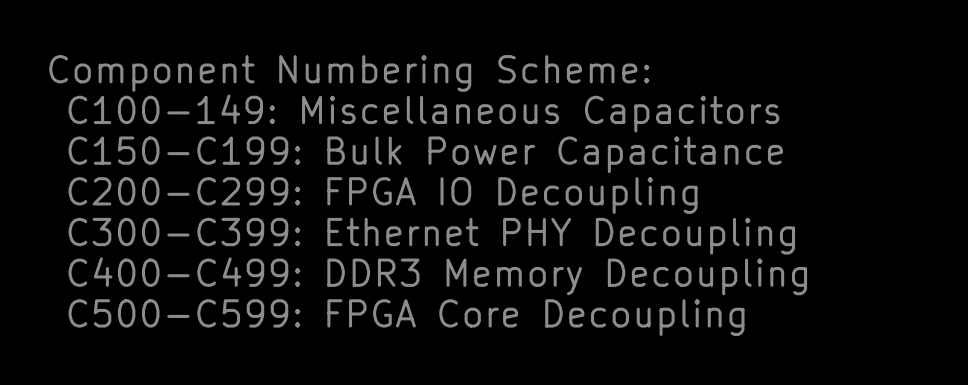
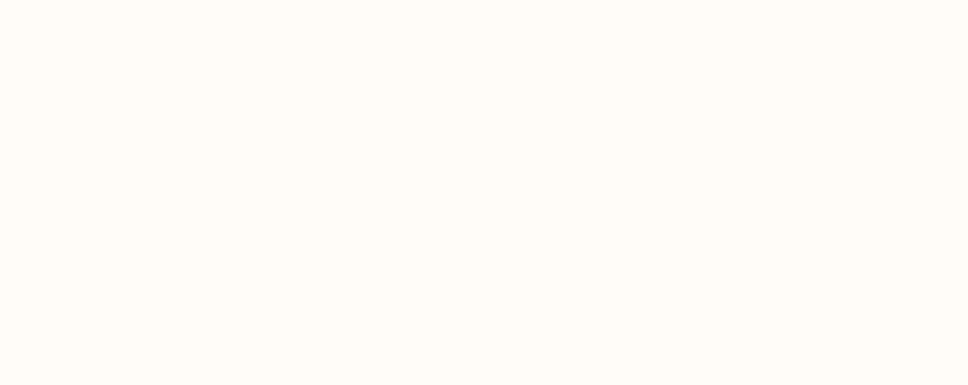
text: Component Numbering Scheme: (349, 73) -> none
text: C100-149: Miscellaneous Capacitors (423, 113) -> none
text: C150-C199: Bulk Power Capacitance (425, 154) -> none
text: C200-C299: FPGA IO Decoupling (383, 195) -> none
text: C300-C399: Ethernet PHY Decoupling (431, 236) -> none
text: C400-C499: DDR3 Memory Decoupling (437, 276) -> none
text: C500-C599: FPGA Core Decoupling (406, 317) -> none

